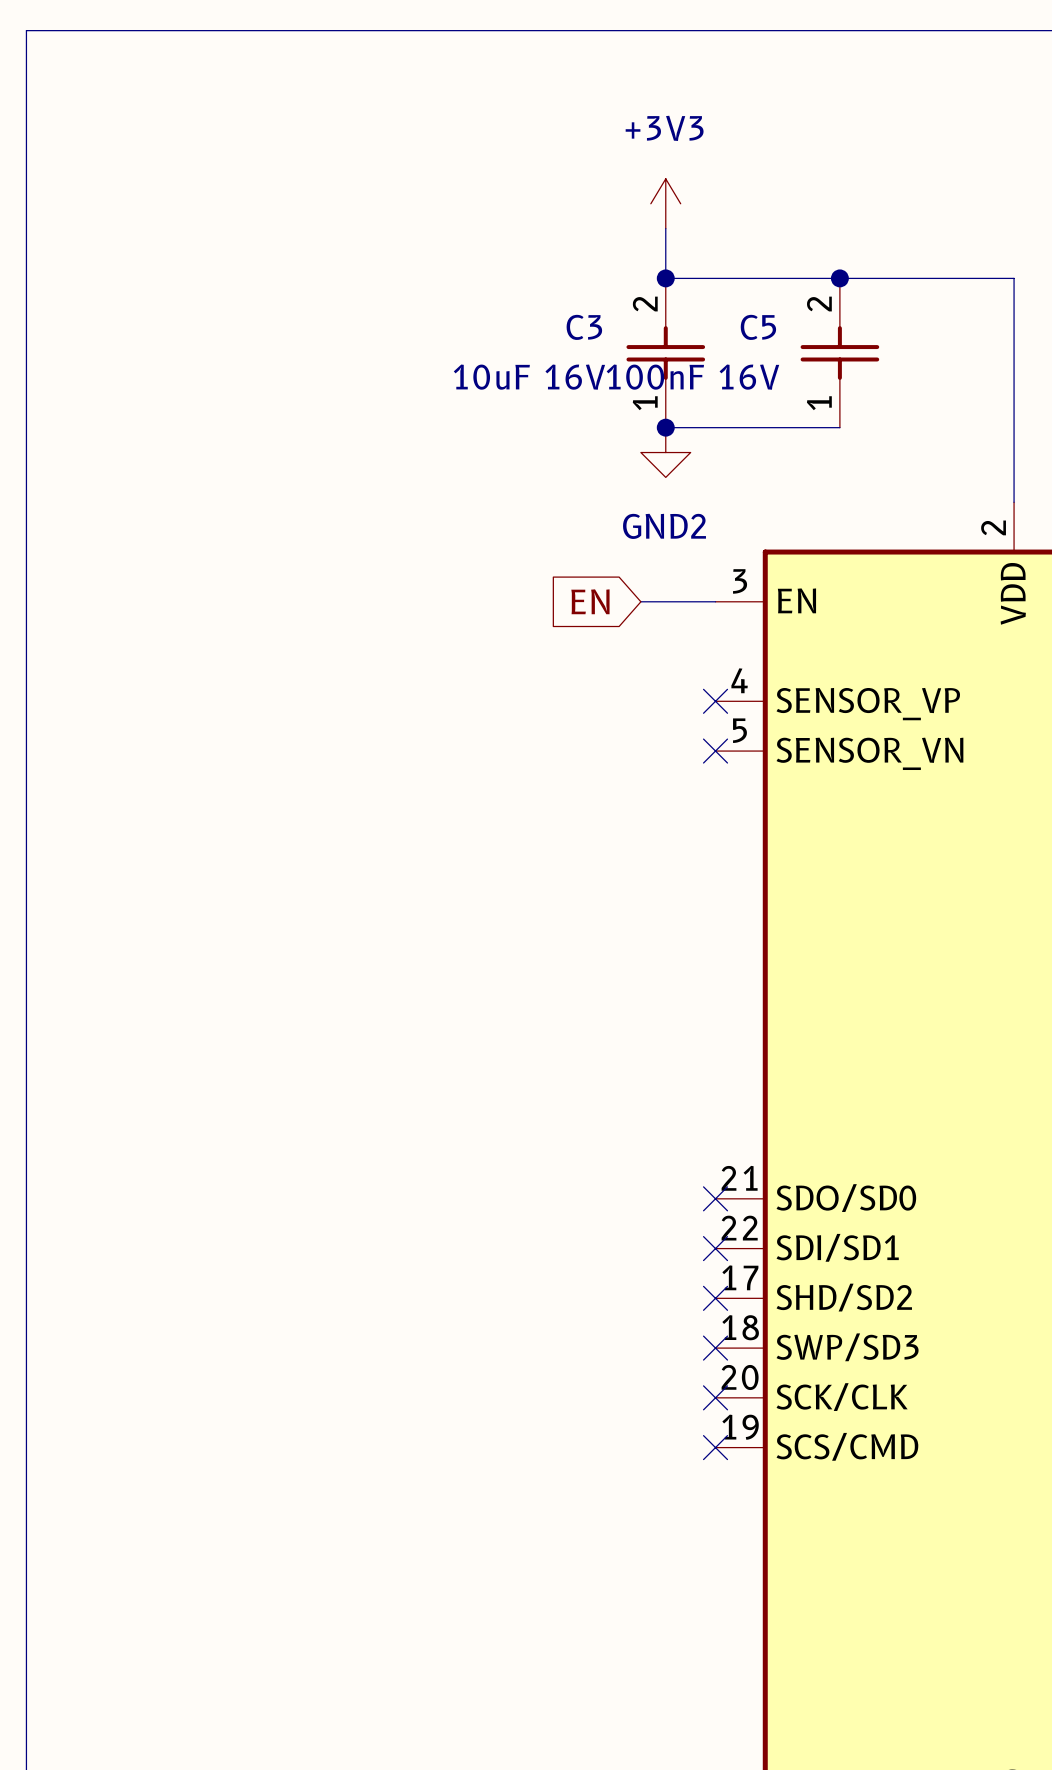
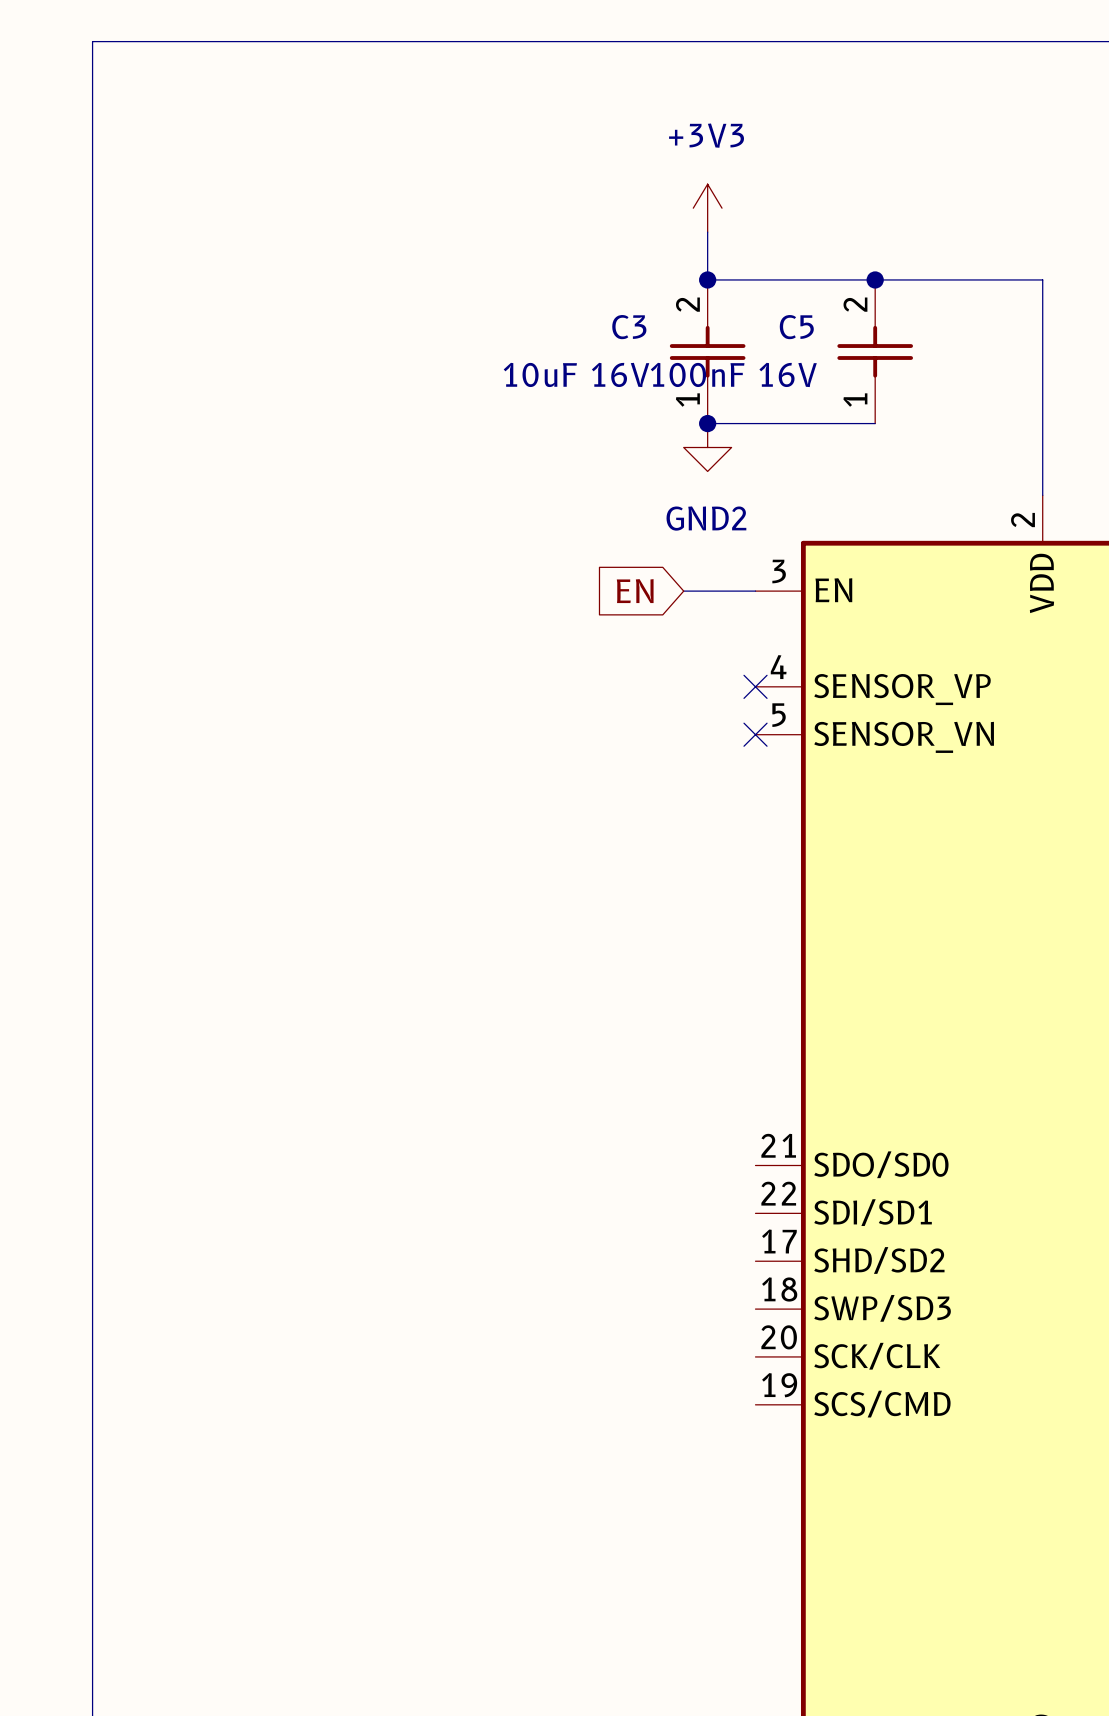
no-connect mark: (715, 1198) -> none
no-connect mark: (715, 1248) -> none
no-connect mark: (715, 1298) -> none
no-connect mark: (715, 1348) -> none
no-connect mark: (715, 1397) -> none
no-connect mark: (715, 1447) -> none

